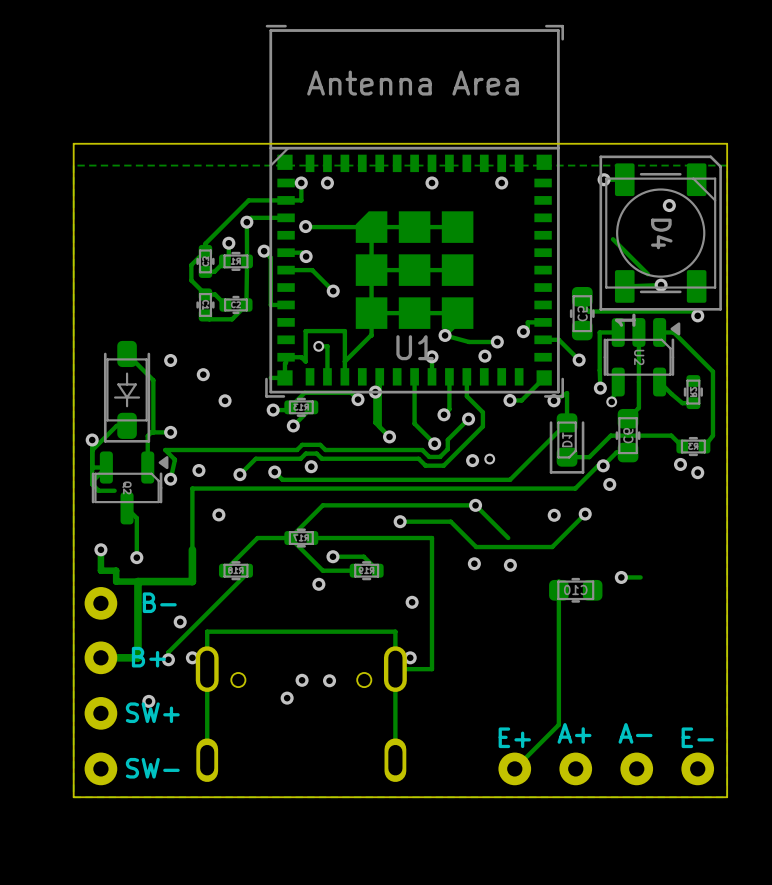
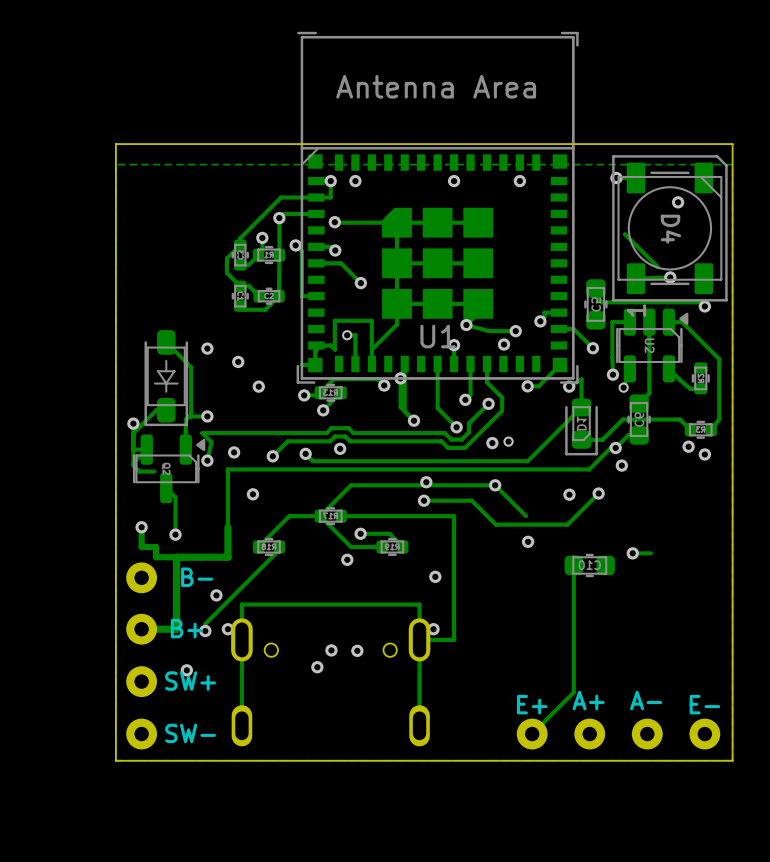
via position: (474, 563) -> (426, 482)

